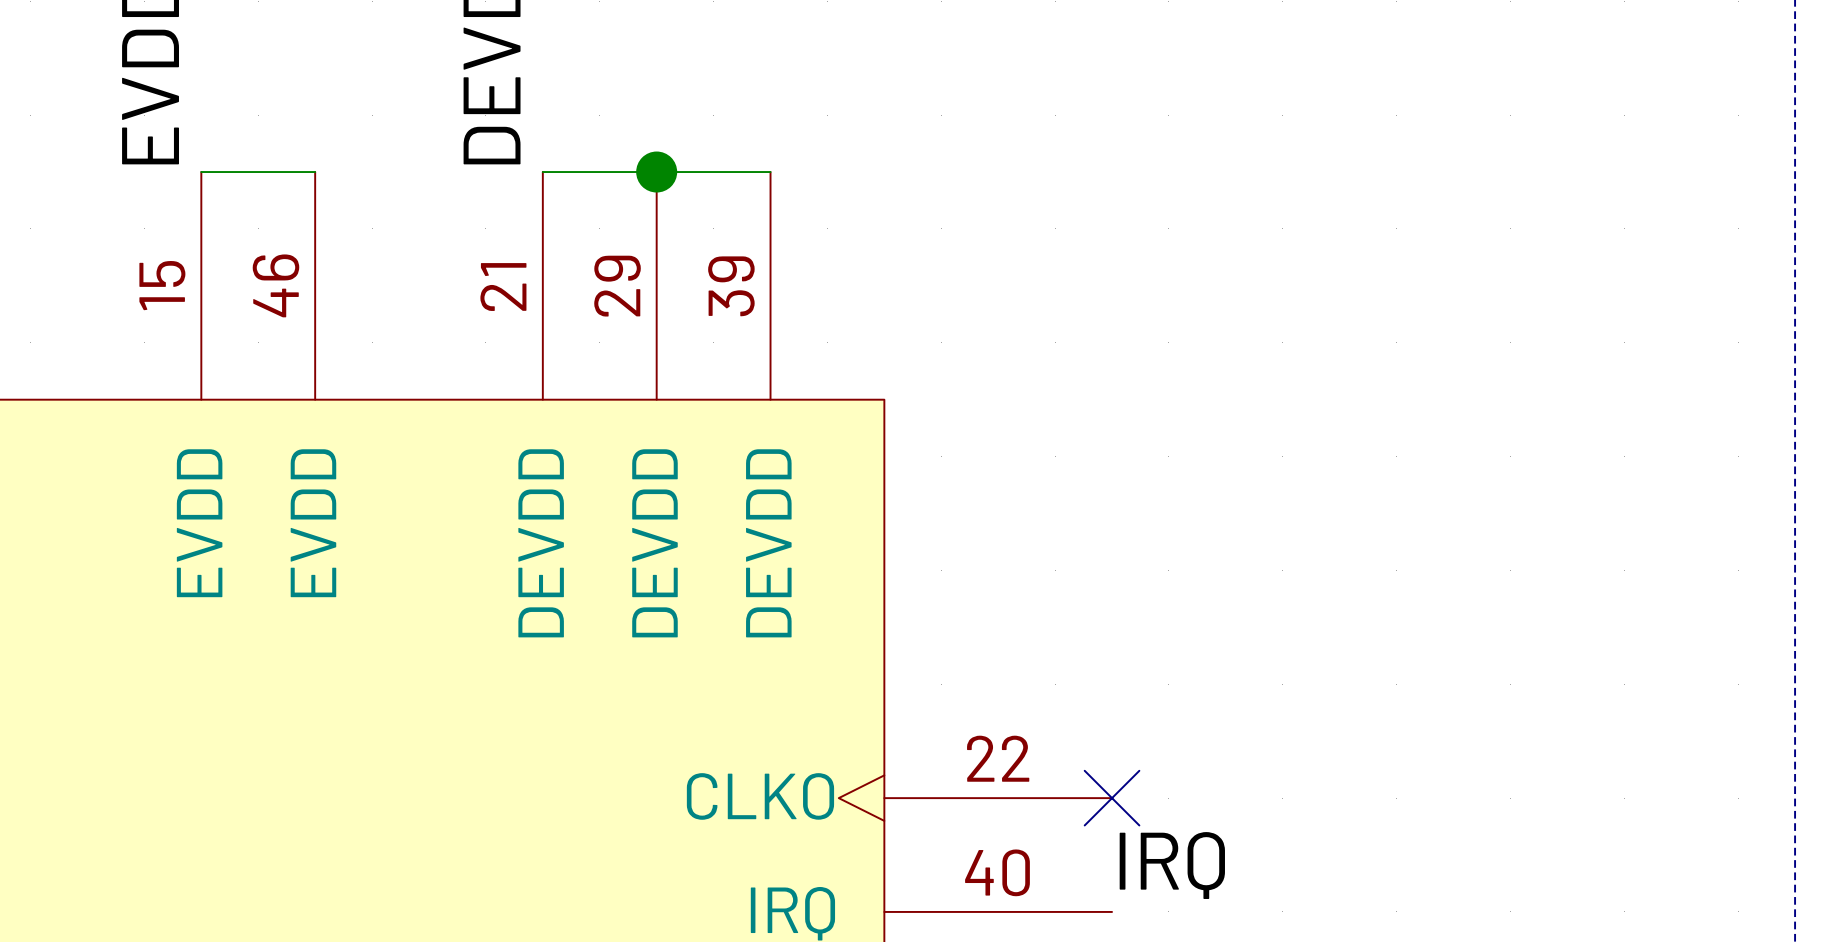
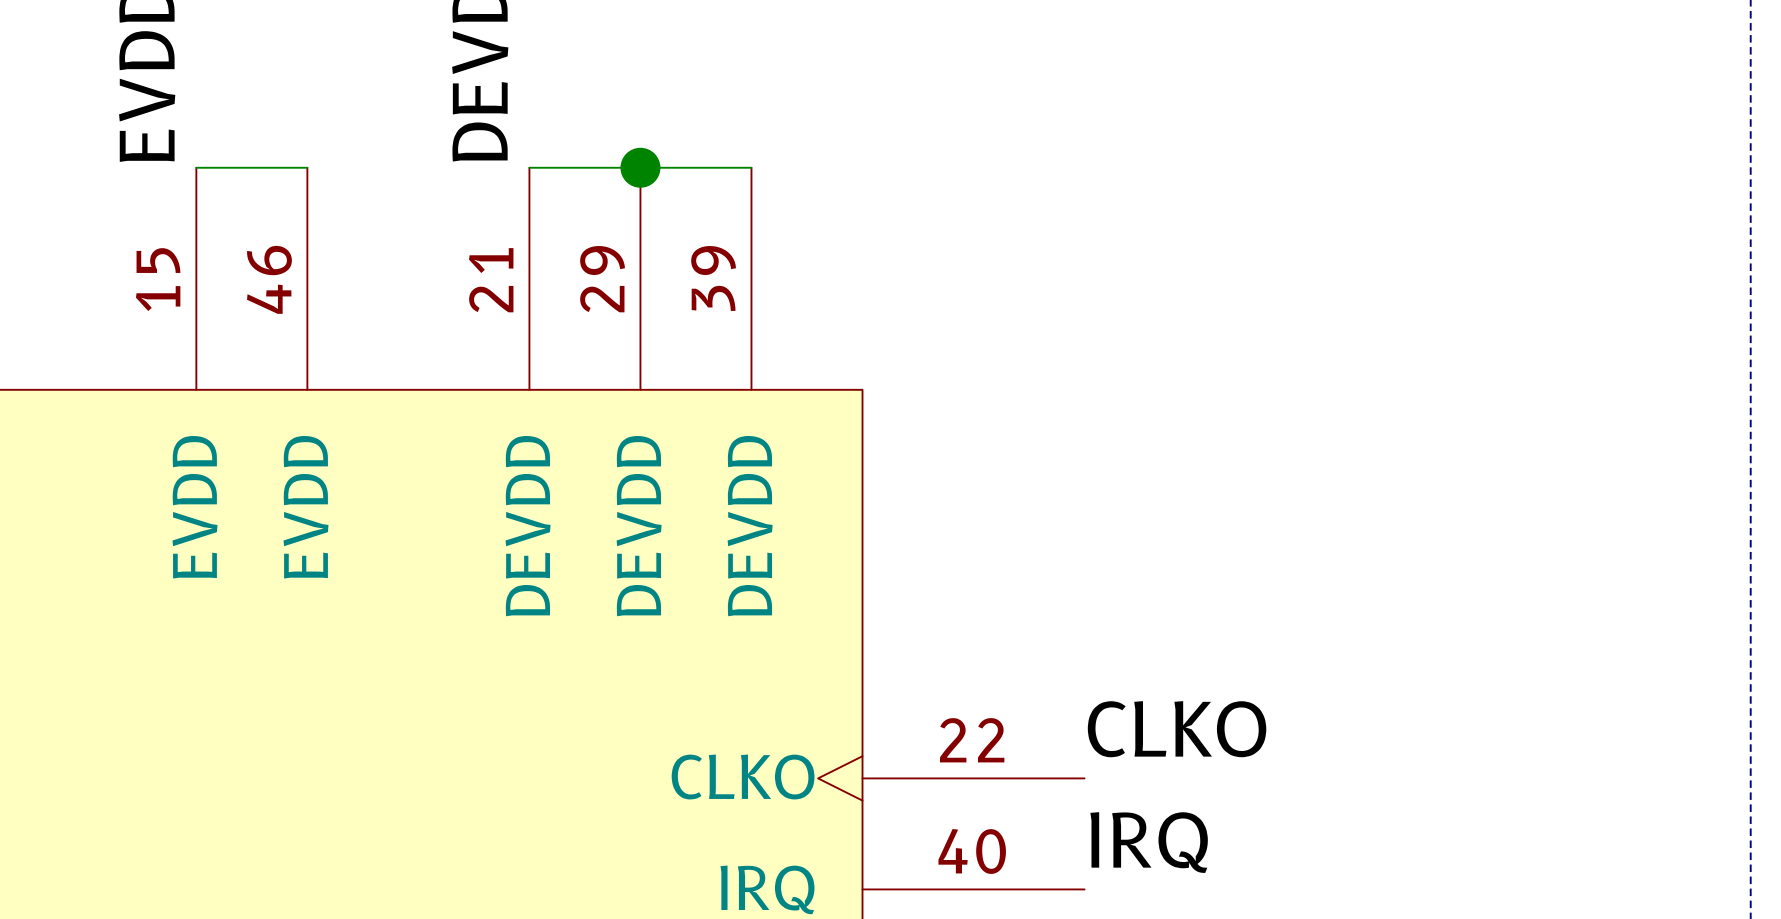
label: none -> CLKO (1177, 729)
no-connect mark: (1112, 798) -> none

